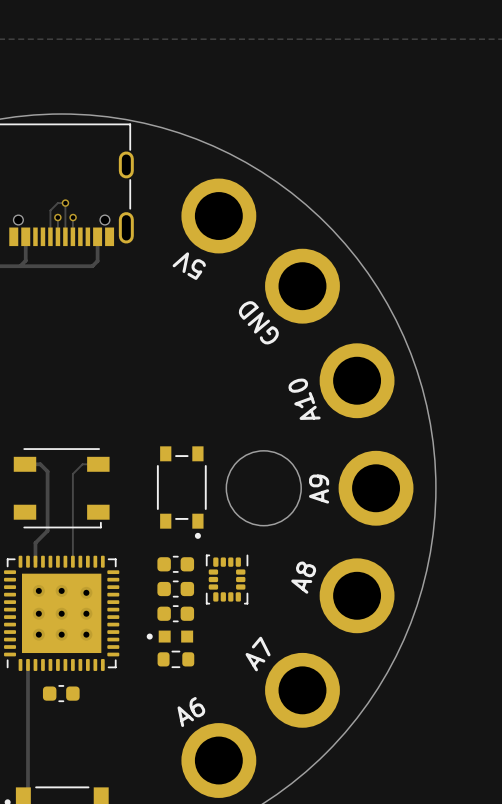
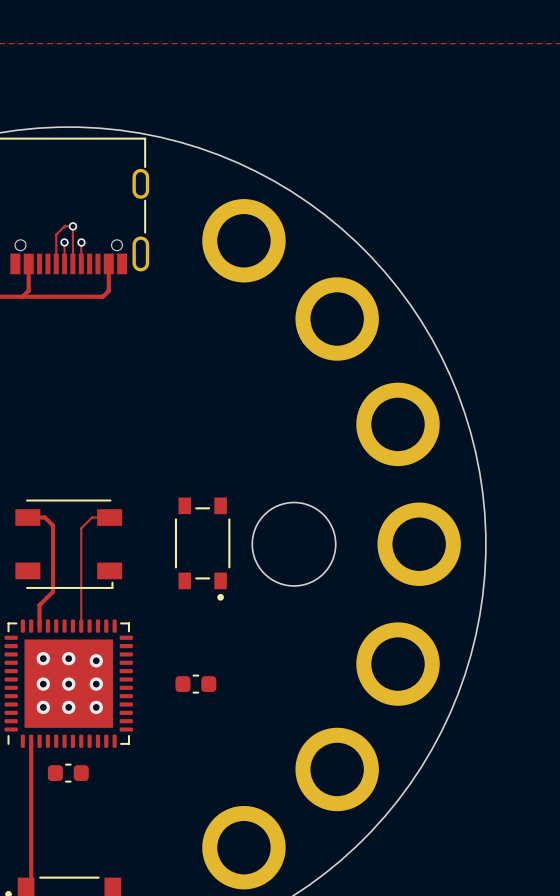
text: 5V (189, 266) -> none
text: GND (258, 322) -> none
text: A10 (304, 399) -> none
text: A9 (319, 489) -> none
part: (175, 564) -> none
text: A8 (303, 577) -> none
part: (227, 579) -> none
part: (175, 589) -> none
part: (169, 636) -> none
text: A7 (258, 654) -> none
part: (175, 659) -> none
text: A6 (191, 712) -> none

